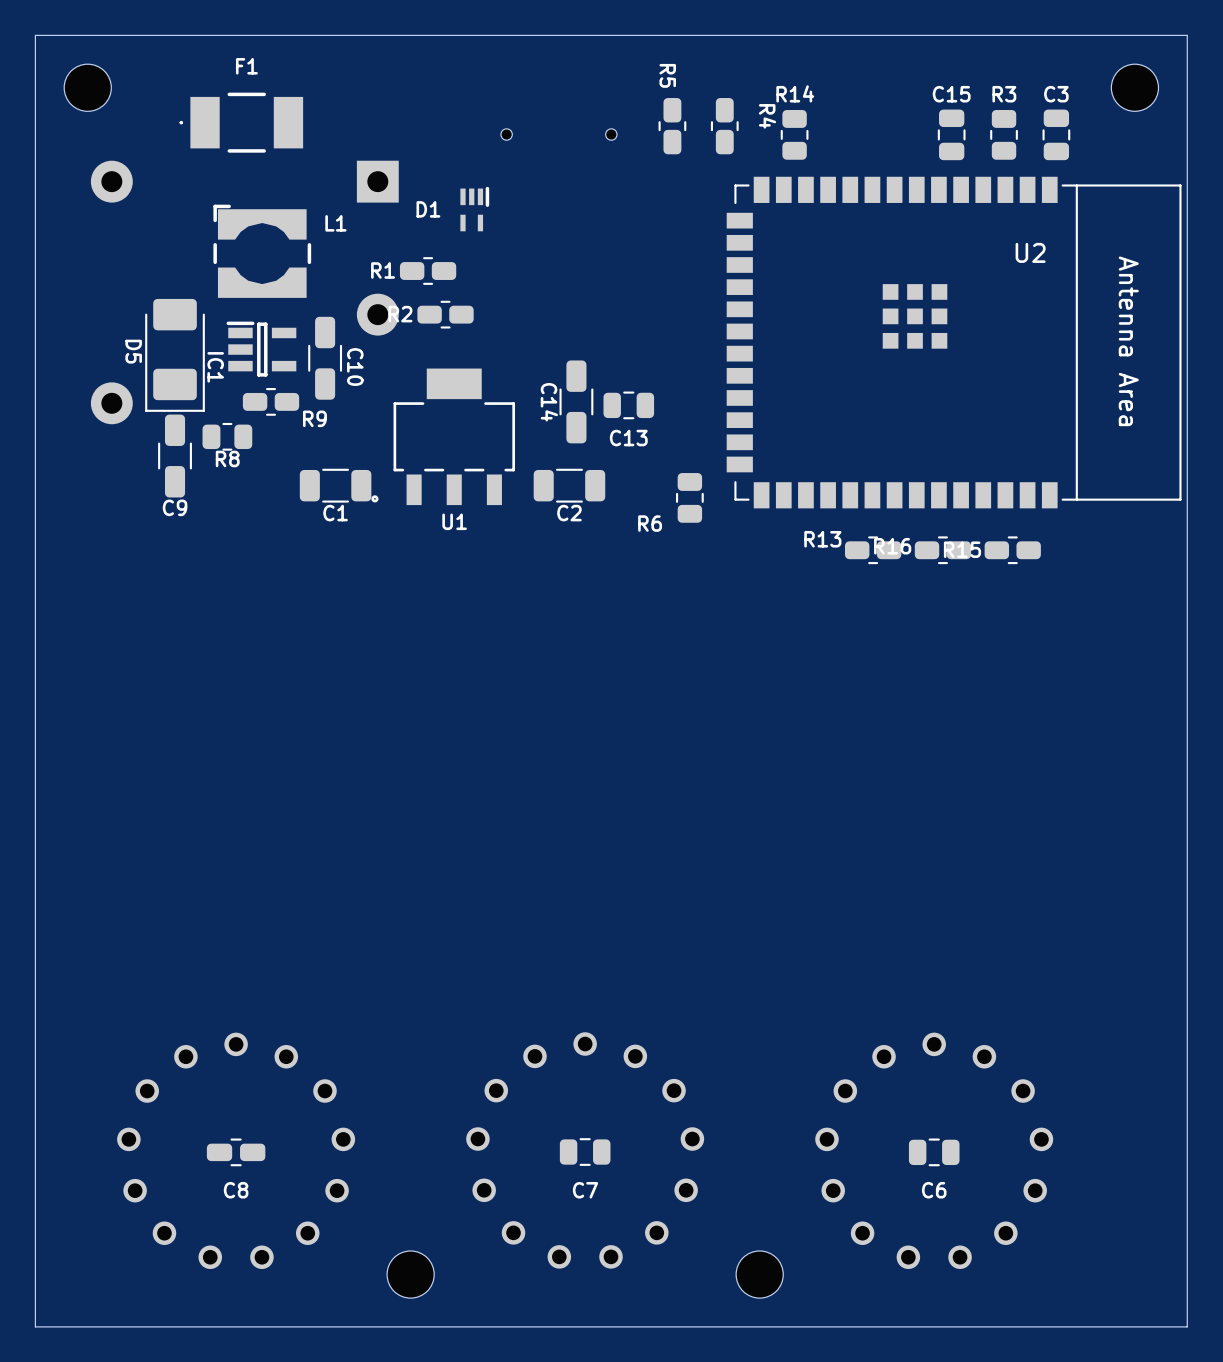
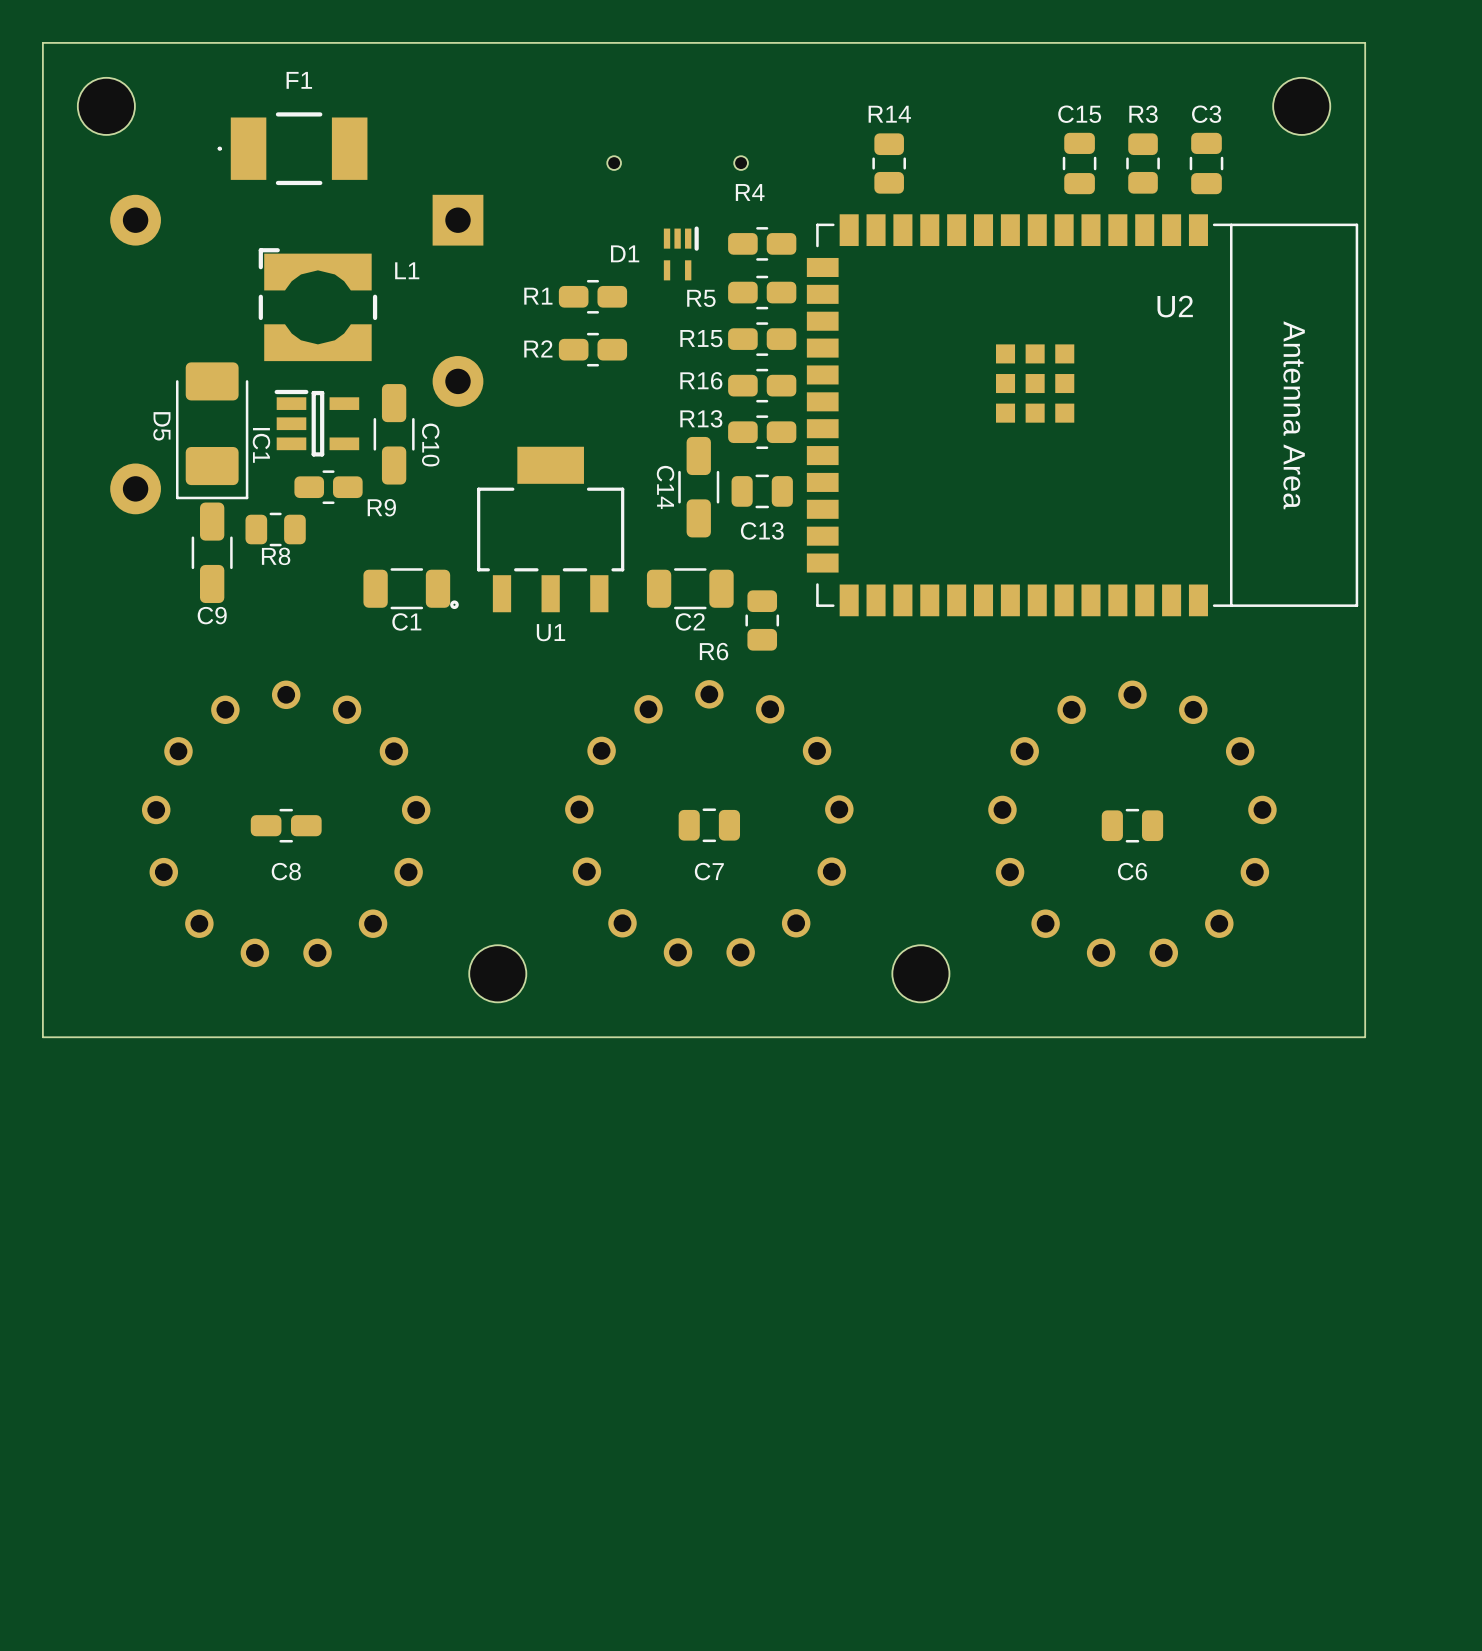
board edge: (1126, 35) (1187, 35) (1187, 1326) (35, 1326) (35, 855) -> (1365, 42) (1365, 1037) (42, 1037)
R5 name position: R5 (667, 75) -> R5 (701, 298)
part position: (1134, 87) -> (1301, 106)
R4 name position: R4 (767, 116) -> R4 (750, 192)
R5 rotation: 0° (672, 126) -> 90° clockwise (762, 292)
R5 position: (672, 126) -> (762, 292)
R4 rotation: 0° (724, 126) -> 90° clockwise (762, 243)
R4 position: (724, 126) -> (762, 243)
R14 position: (794, 134) -> (889, 163)
C15 position: (951, 134) -> (1079, 163)
R3 position: (1004, 134) -> (1143, 163)
C3 position: (1056, 134) -> (1206, 163)
D1 position: (474, 209) -> (681, 253)
R1 position: (428, 271) -> (592, 296)
R2 position: (445, 314) -> (592, 349)
U2 position: (954, 342) -> (1082, 415)
R6 position: (689, 497) -> (762, 620)
R13 position: (873, 550) -> (762, 432)
R16 position: (942, 550) -> (762, 385)
R15 position: (1012, 550) -> (762, 339)
part: none -> (286, 823)
part: none -> (709, 823)
part: none -> (1132, 823)
part: none -> (497, 973)
part: none -> (920, 973)
part: (236, 1150) -> none
part: (585, 1150) -> none
part: (934, 1150) -> none
C8 position: (236, 1152) -> (286, 825)
C7 position: (585, 1152) -> (709, 825)
C6 position: (934, 1152) -> (1132, 825)
part: (410, 1274) -> none
part: (759, 1274) -> none

